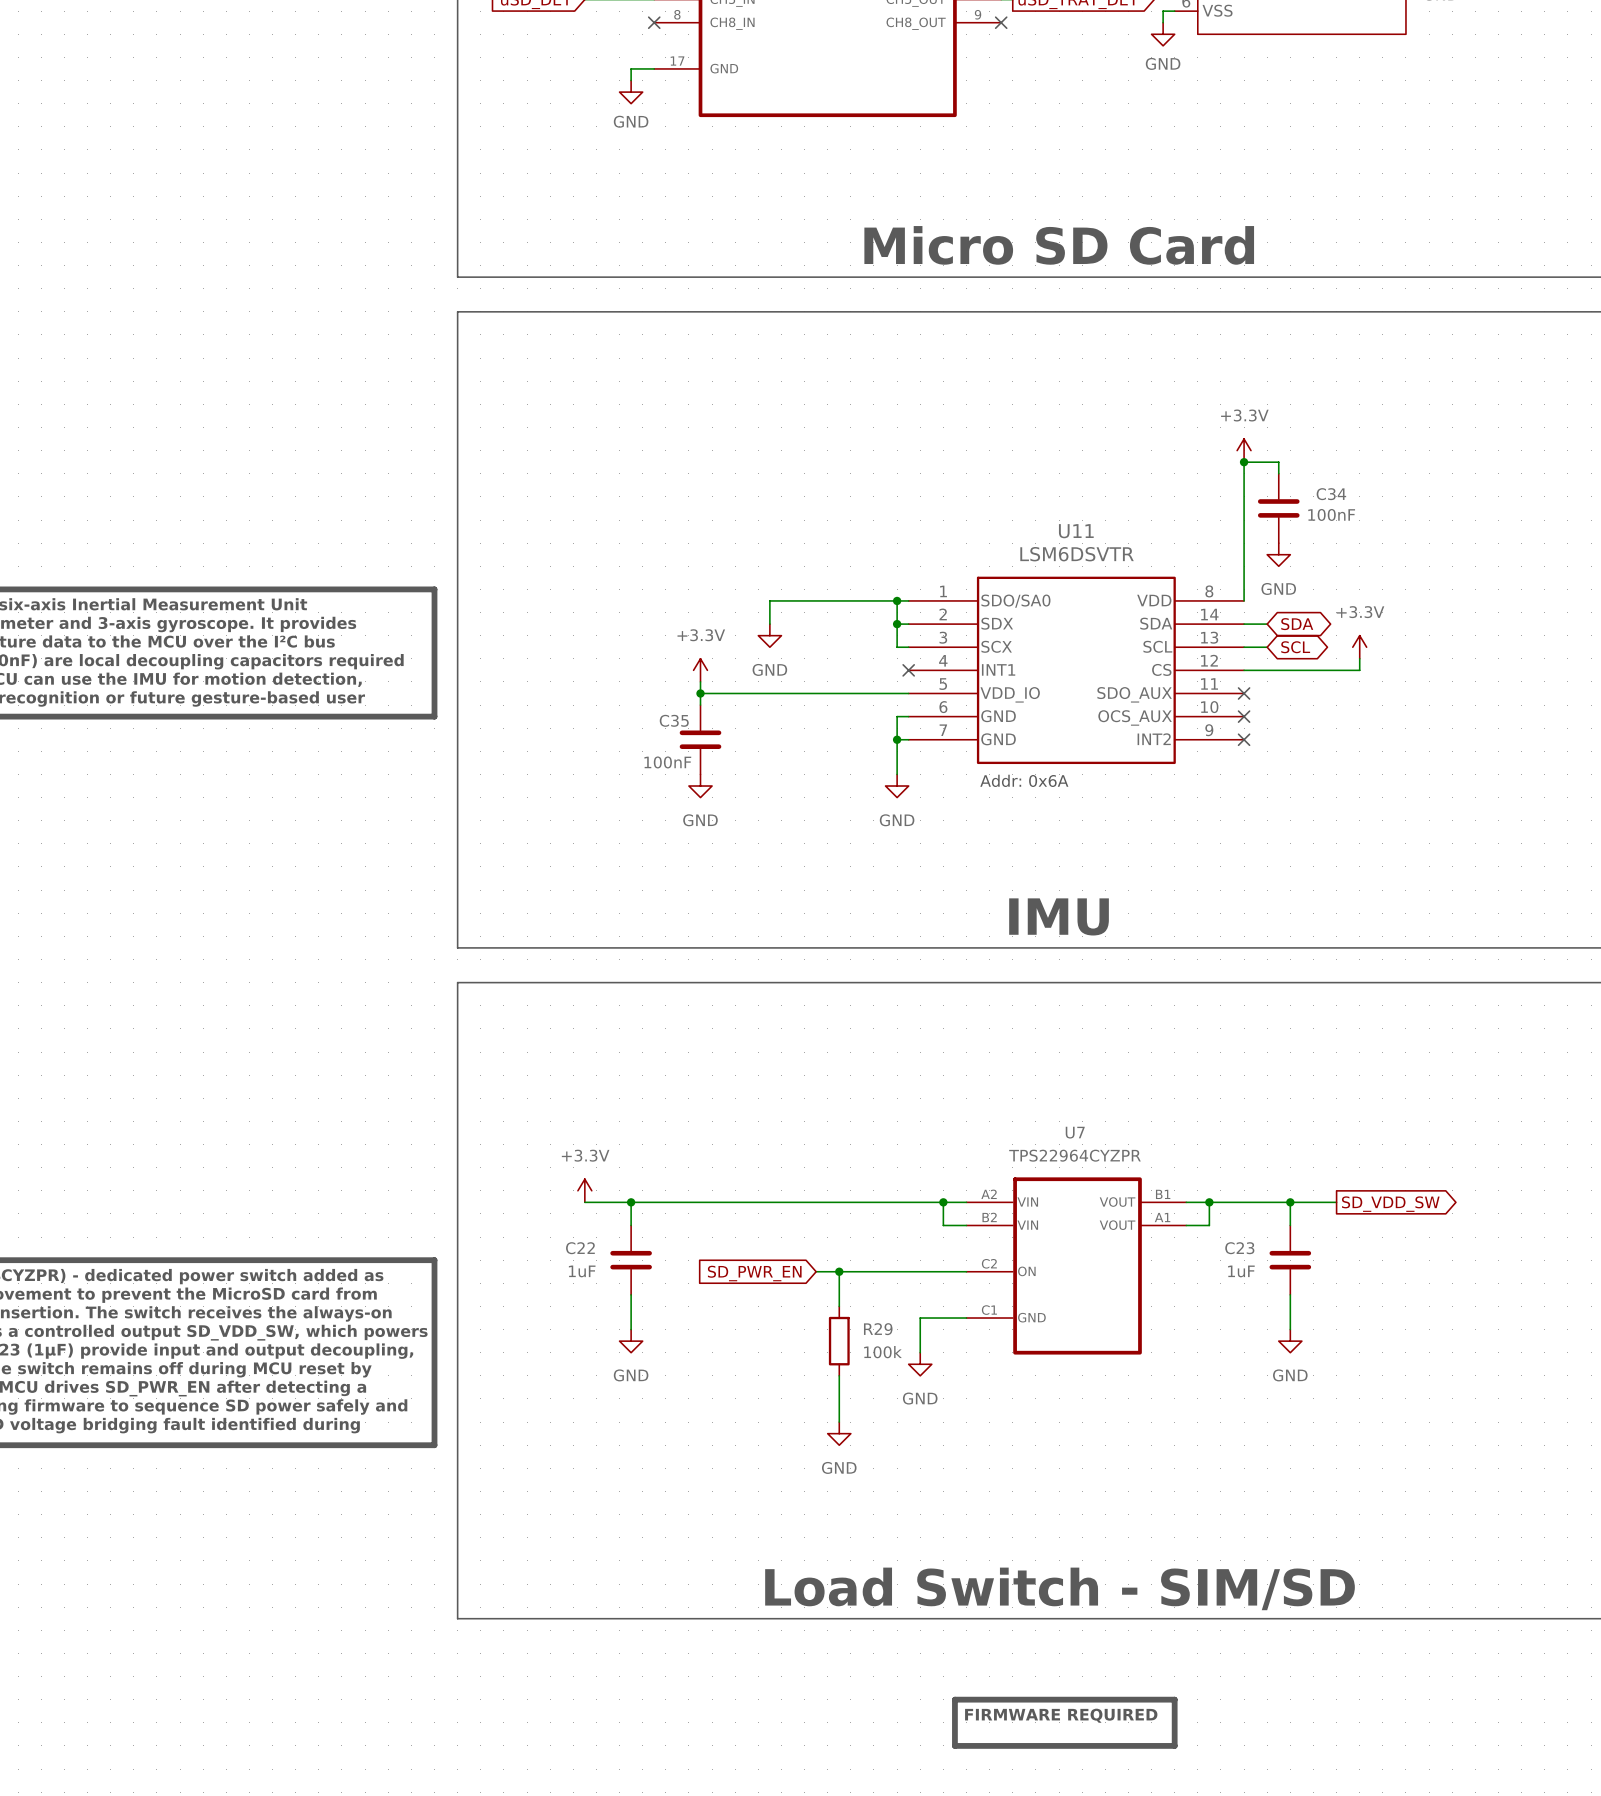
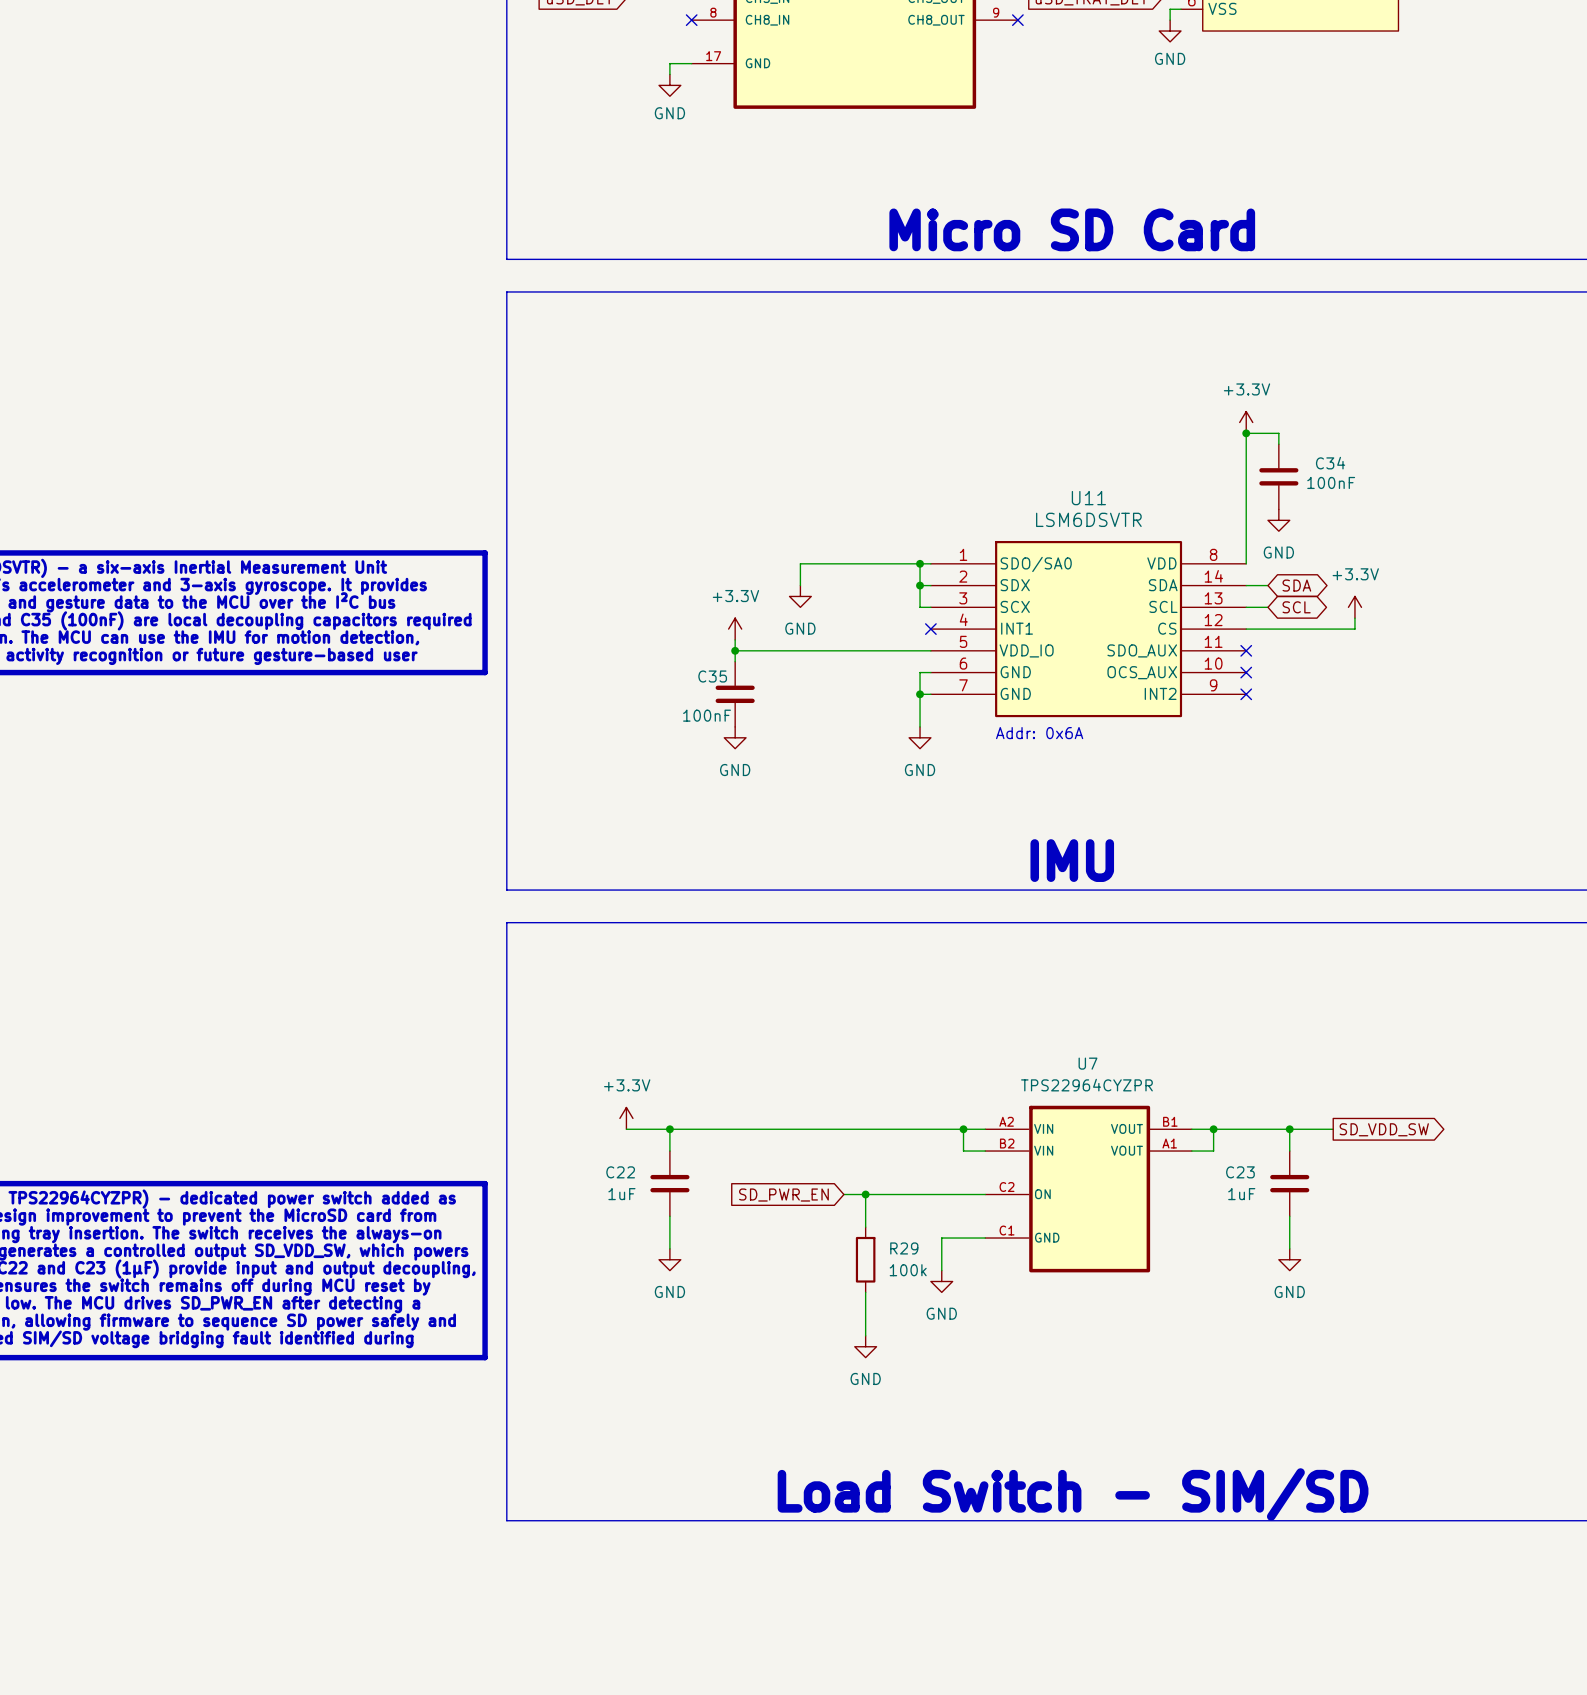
line: (954, 1699) (1174, 1699) (1174, 1745) (954, 1745) (954, 1699) -> none
text: FIRMWARE REQUIRED (1061, 1715) -> none

